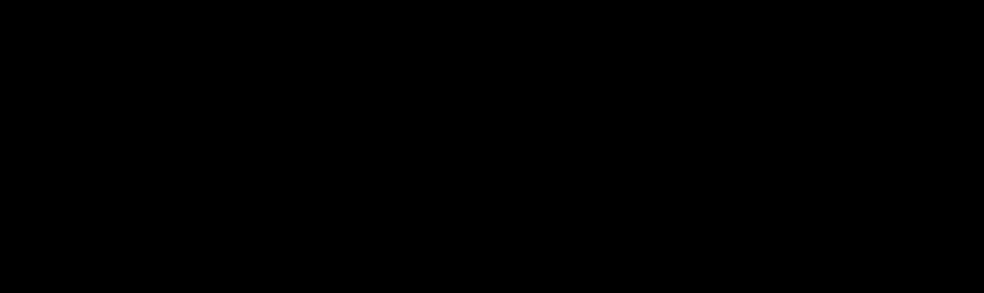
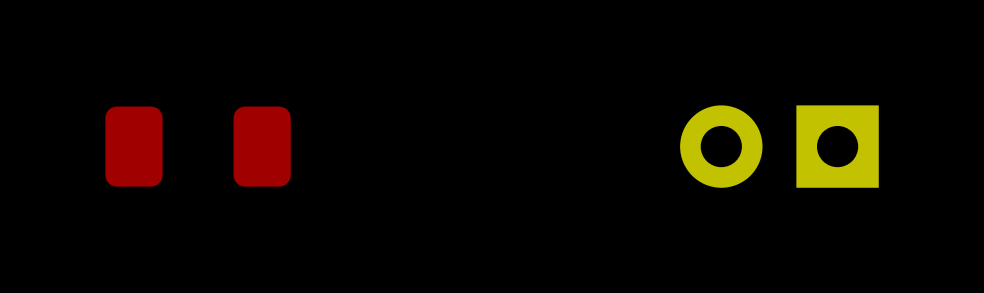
part: none -> (198, 146)
part: none -> (779, 146)

